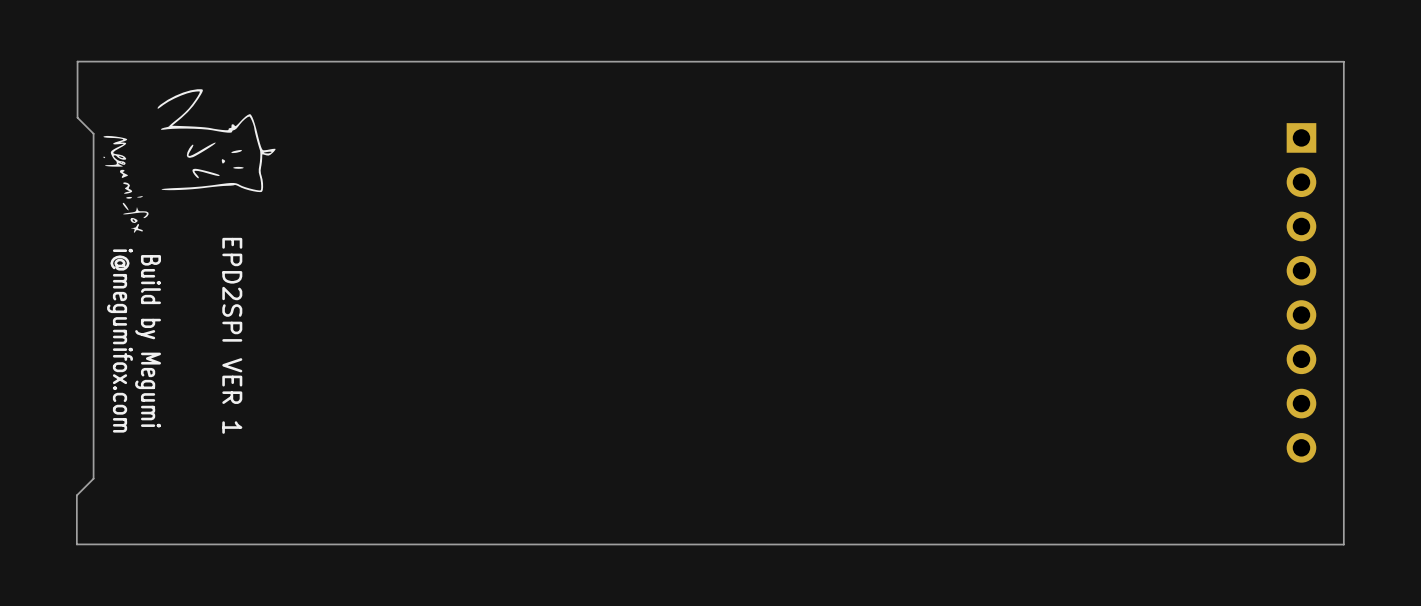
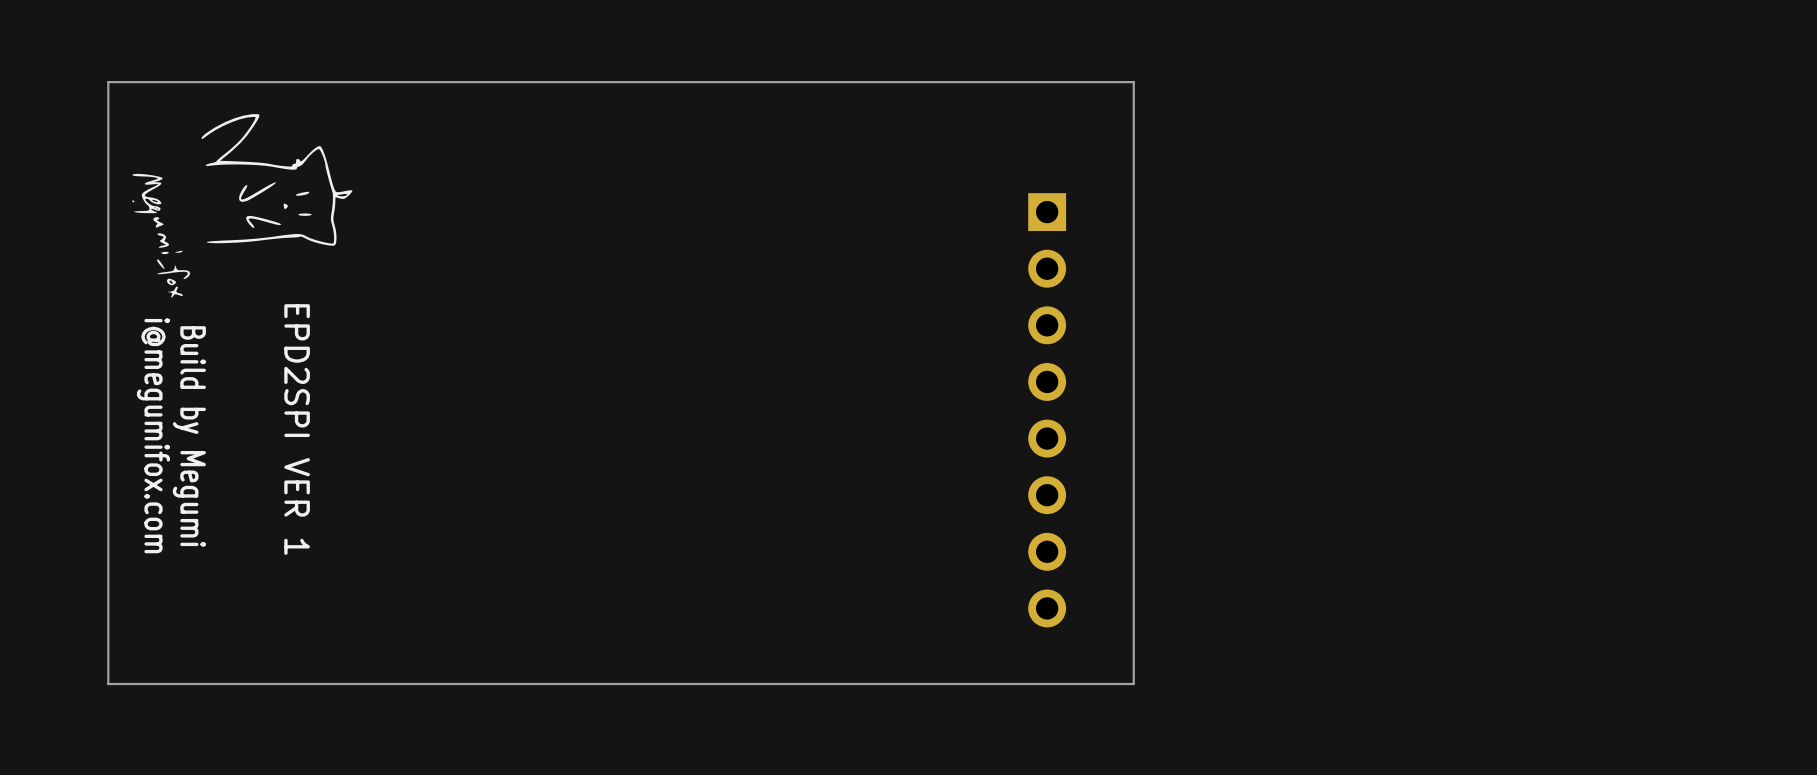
board edge: (77, 61) (77, 117) (93, 133) (93, 478) (76, 495) (76, 544) (1343, 544) (1343, 61) (77, 61) -> (1133, 82) (1133, 684) (108, 684) (108, 82) (1133, 82)
part: (1301, 292) -> none
part: none -> (1047, 410)

